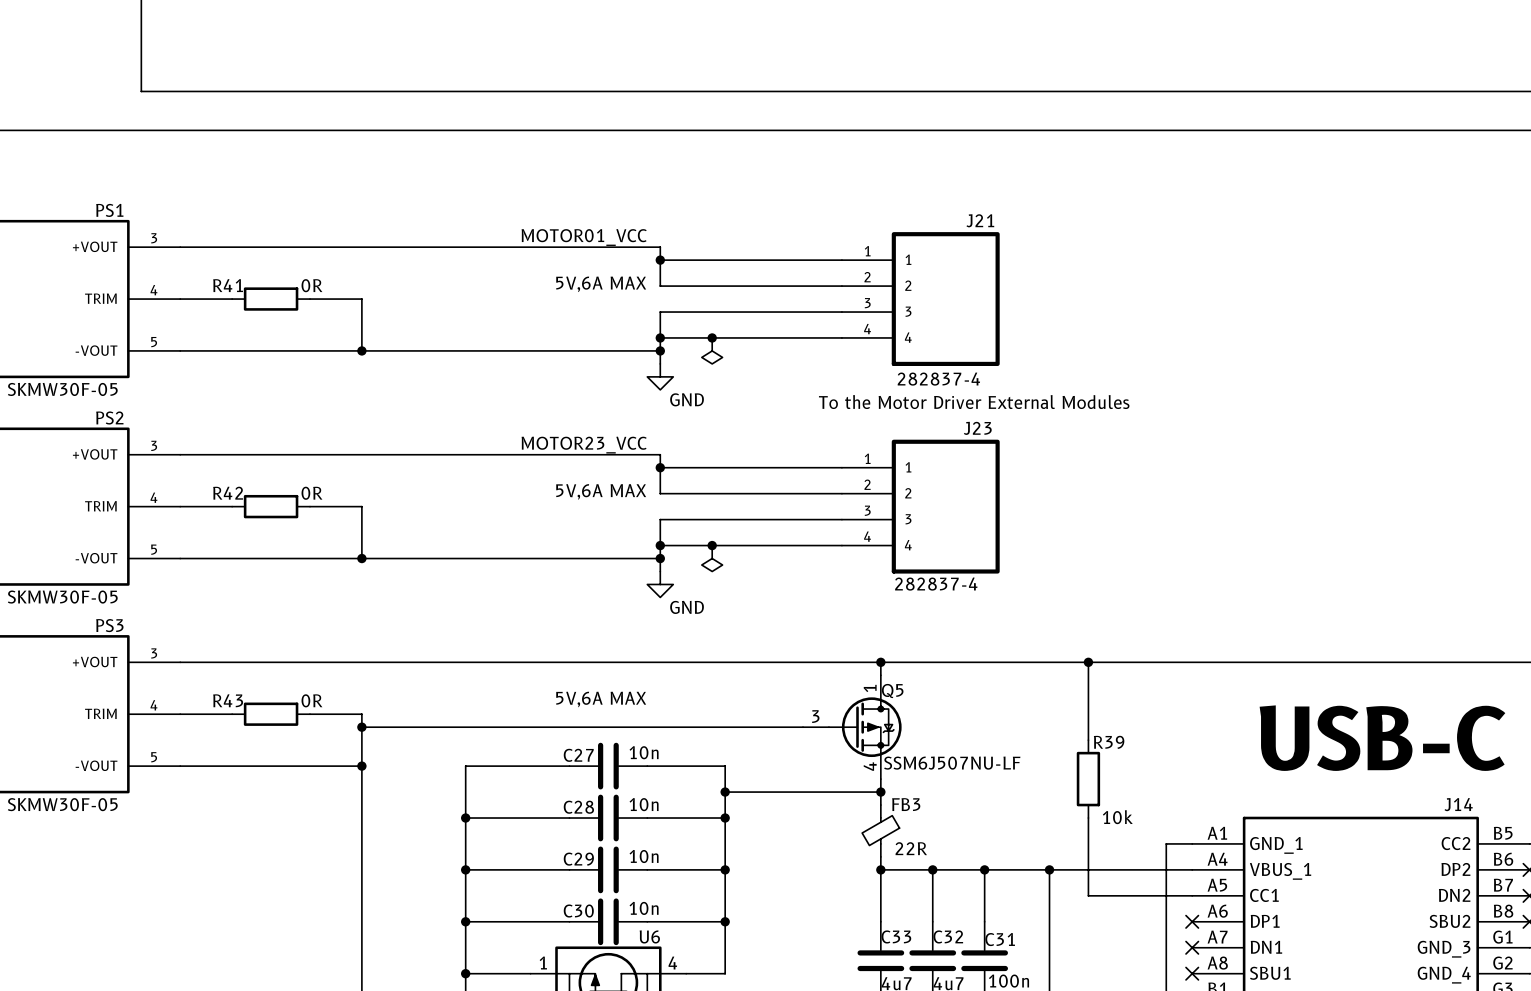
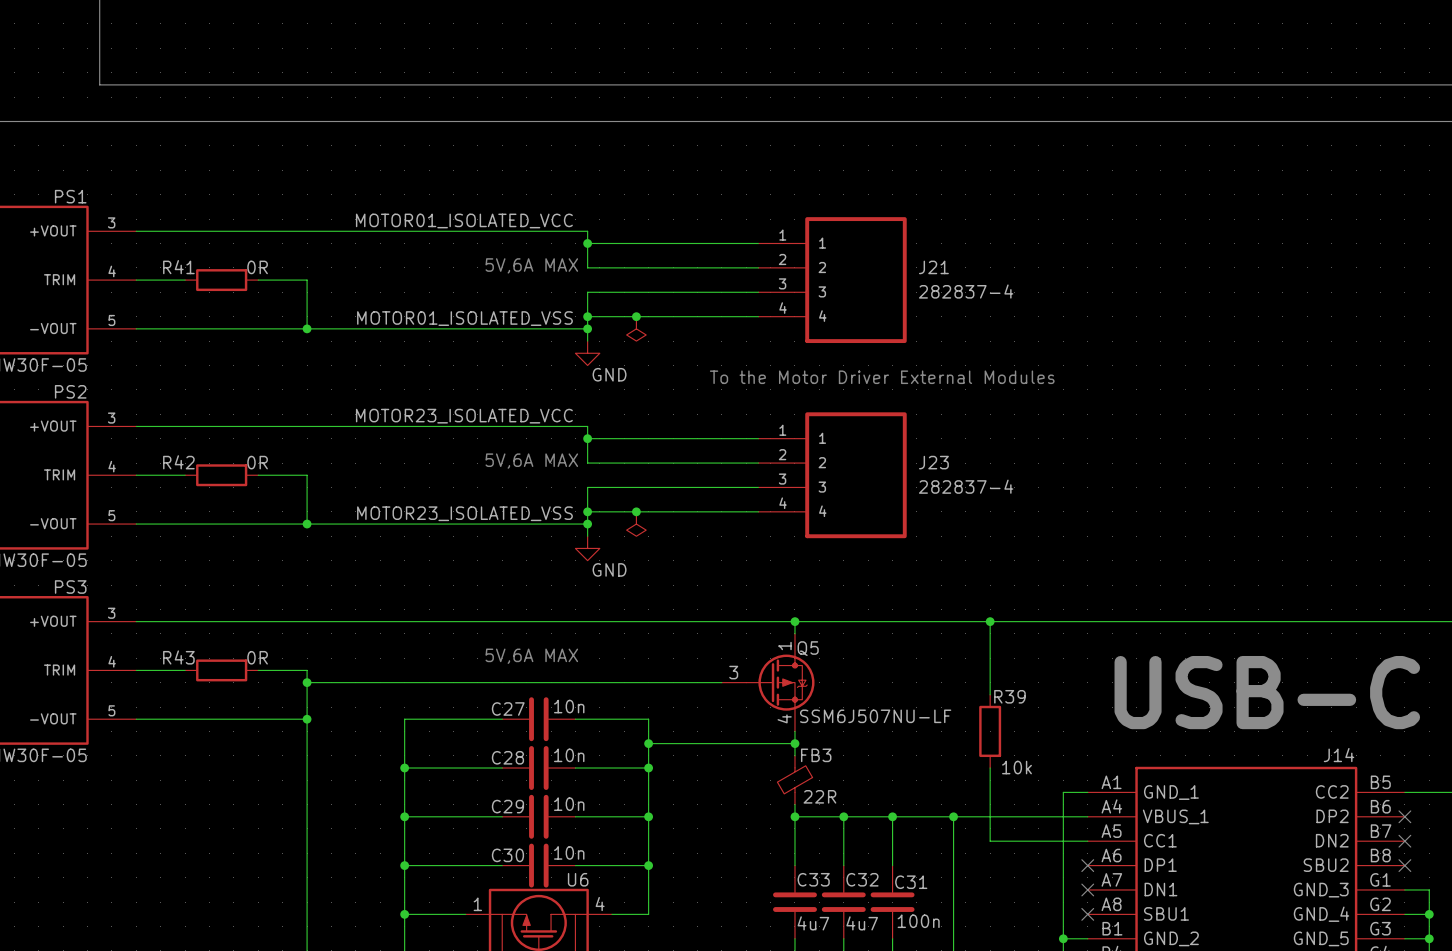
J21 name position: J21 (980, 220) -> J21 (933, 267)
label: MOTOR01_VCC (584, 237) -> MOTOR01_ISOLATED_VCC (464, 220)
label: none -> MOTOR01_ISOLATED_VSS (464, 318)
J21 value position: 282837-4 (938, 379) -> 282837-4 (966, 291)
J23 name position: J23 (977, 428) -> J23 (933, 462)
label: MOTOR23_VCC (584, 445) -> MOTOR23_ISOLATED_VCC (464, 416)
label: none -> MOTOR23_ISOLATED_VSS (464, 513)
J23 value position: 282837-4 (936, 584) -> 282837-4 (966, 486)

